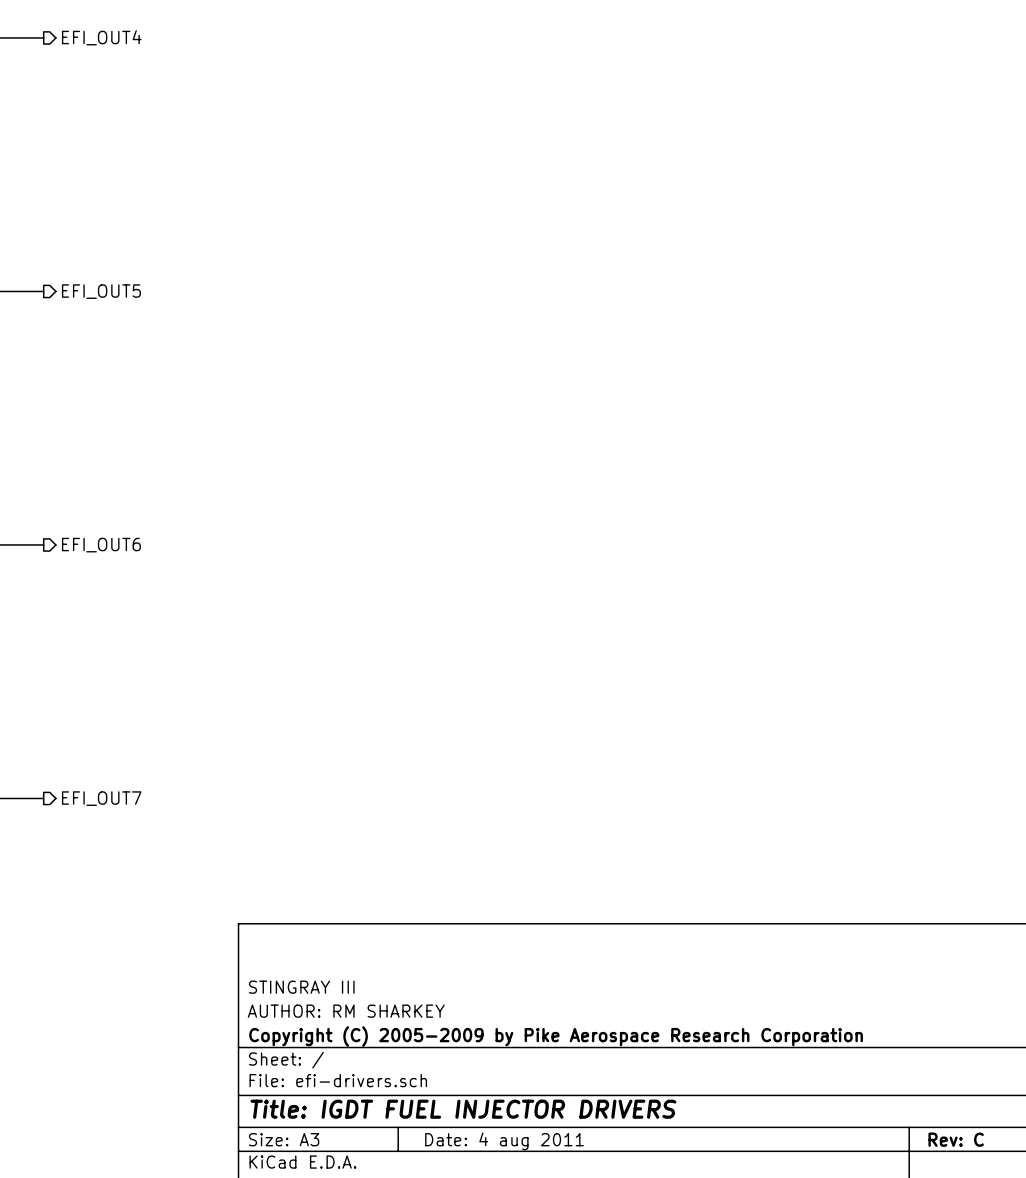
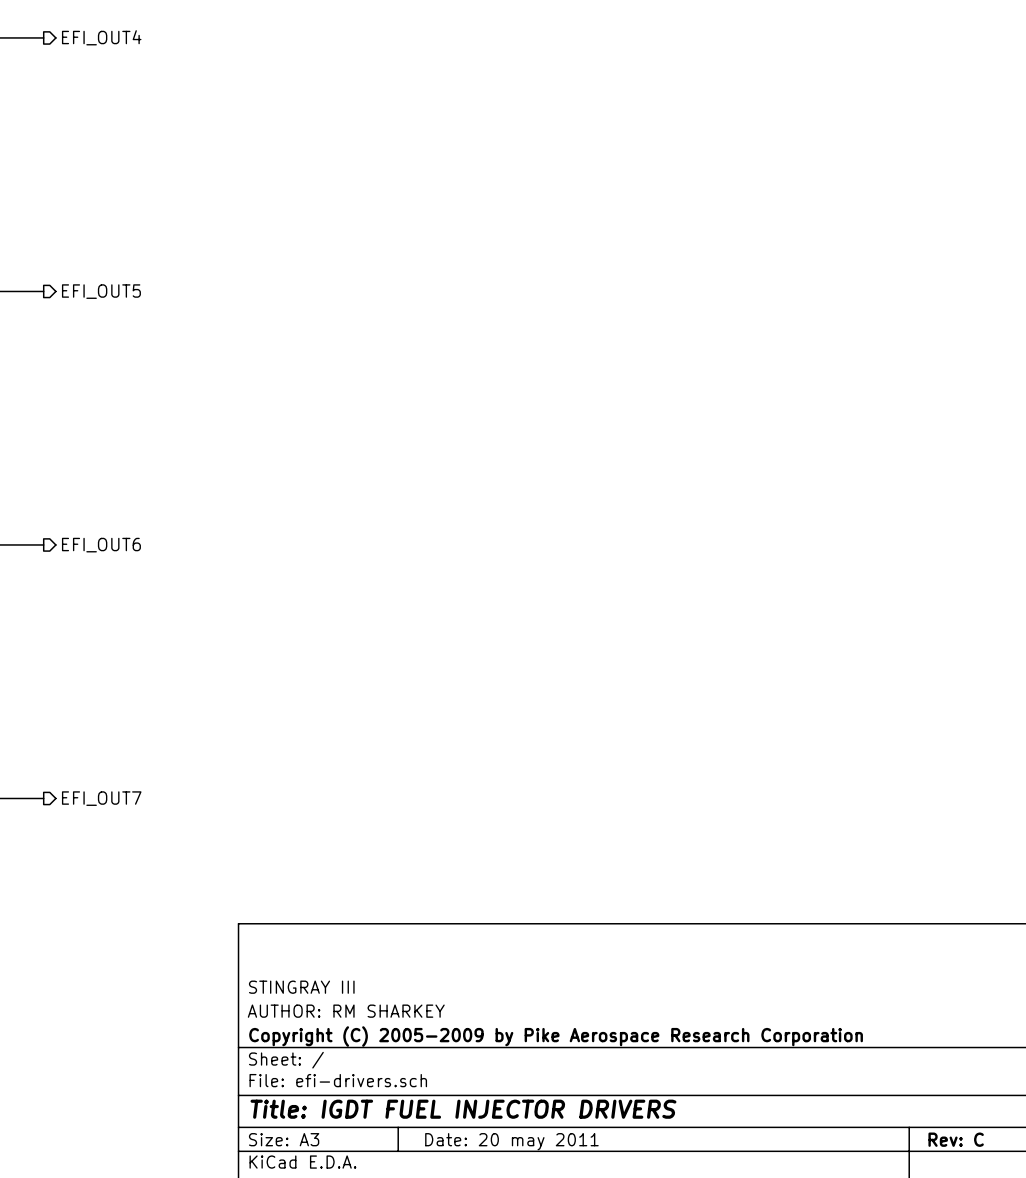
title block: Date: 4 aug 2011 (504, 1141) -> Date: 20 may 2011 (511, 1141)

